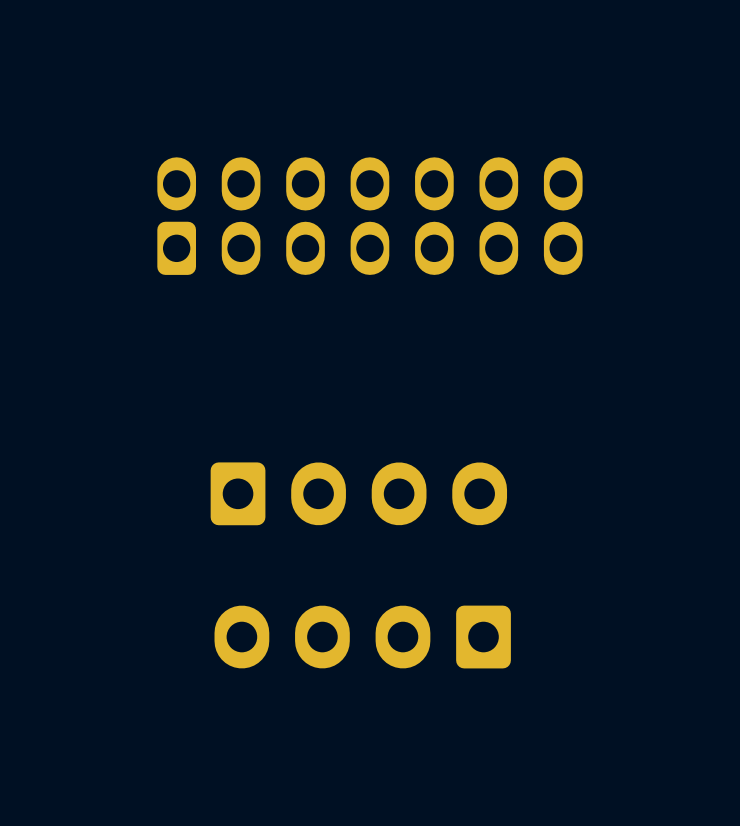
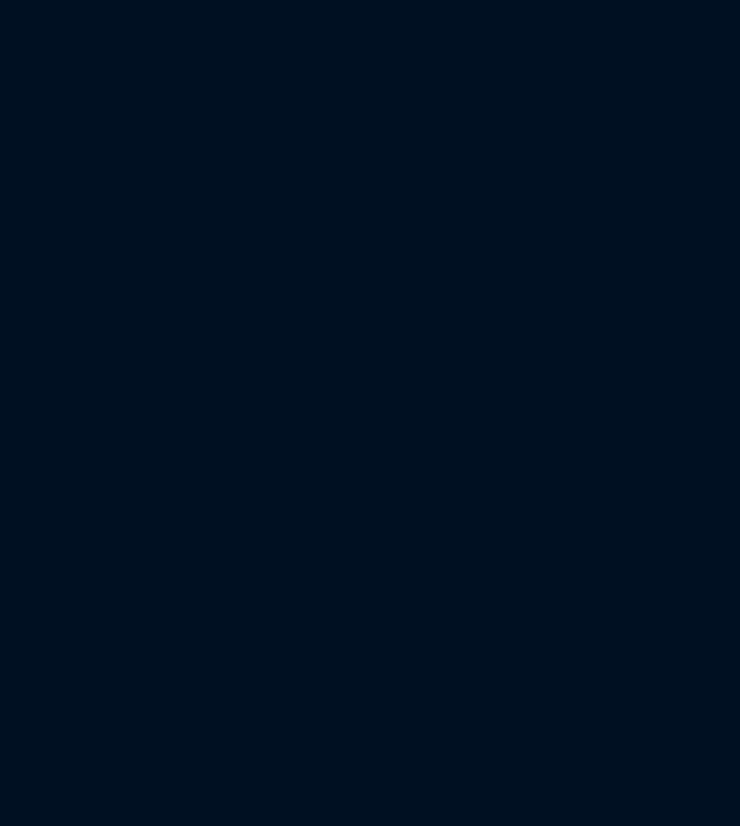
part: (369, 216) -> none
part: (358, 493) -> none
part: (362, 637) -> none

